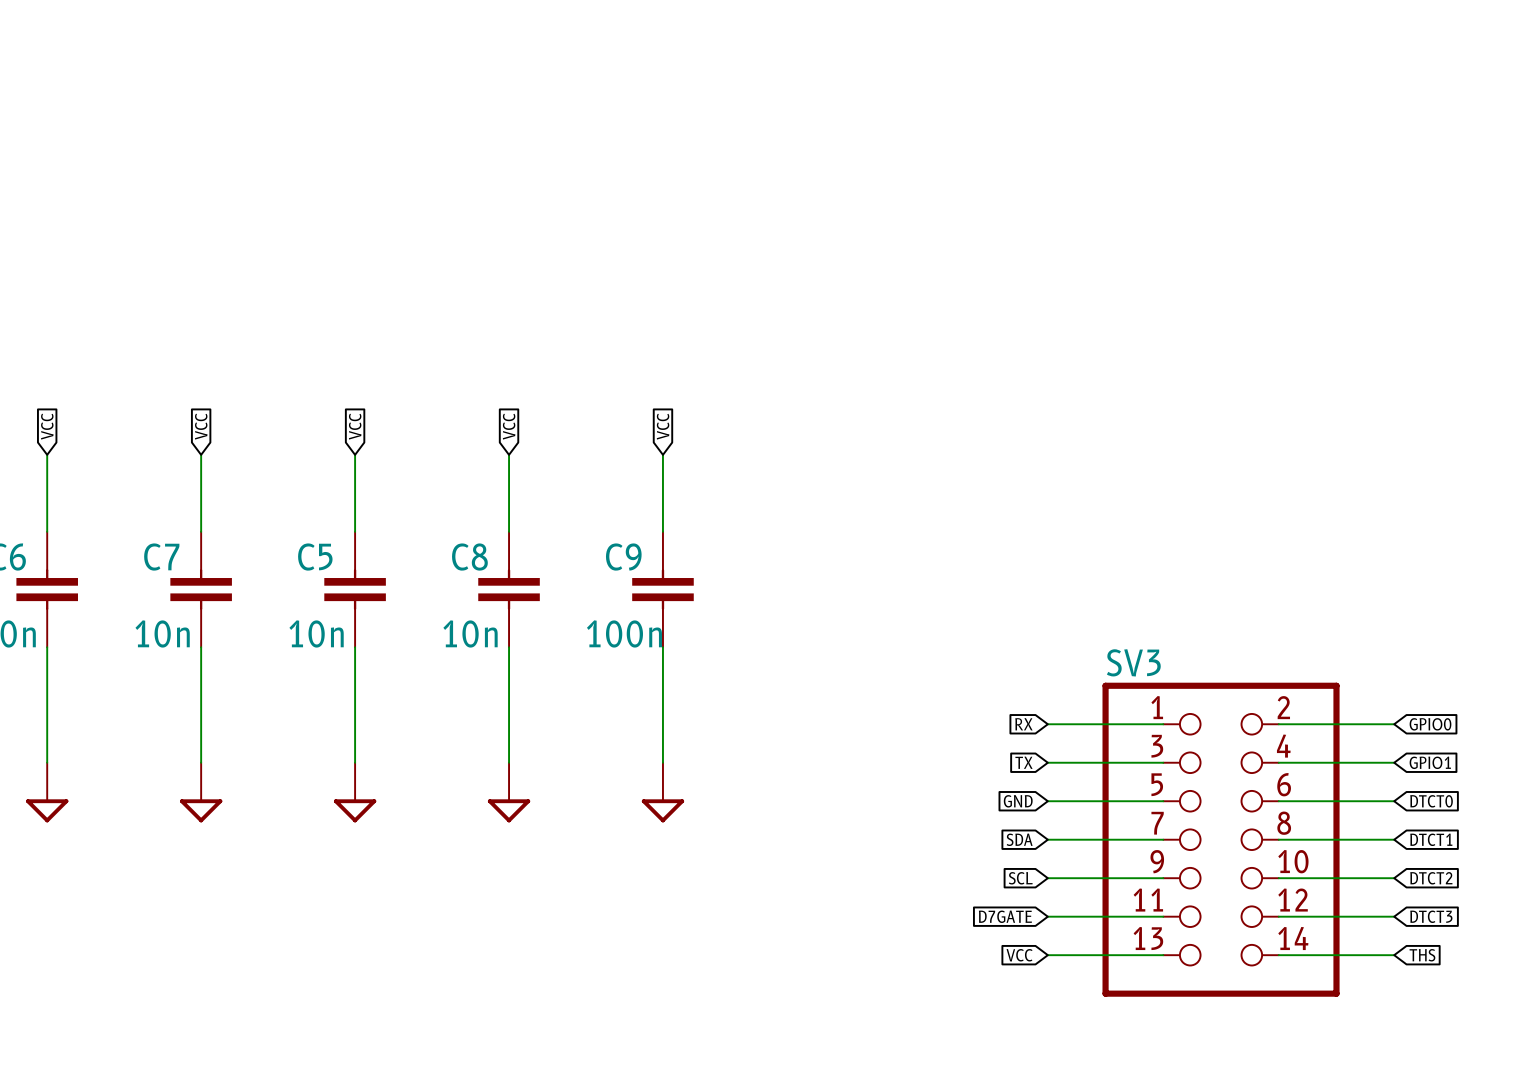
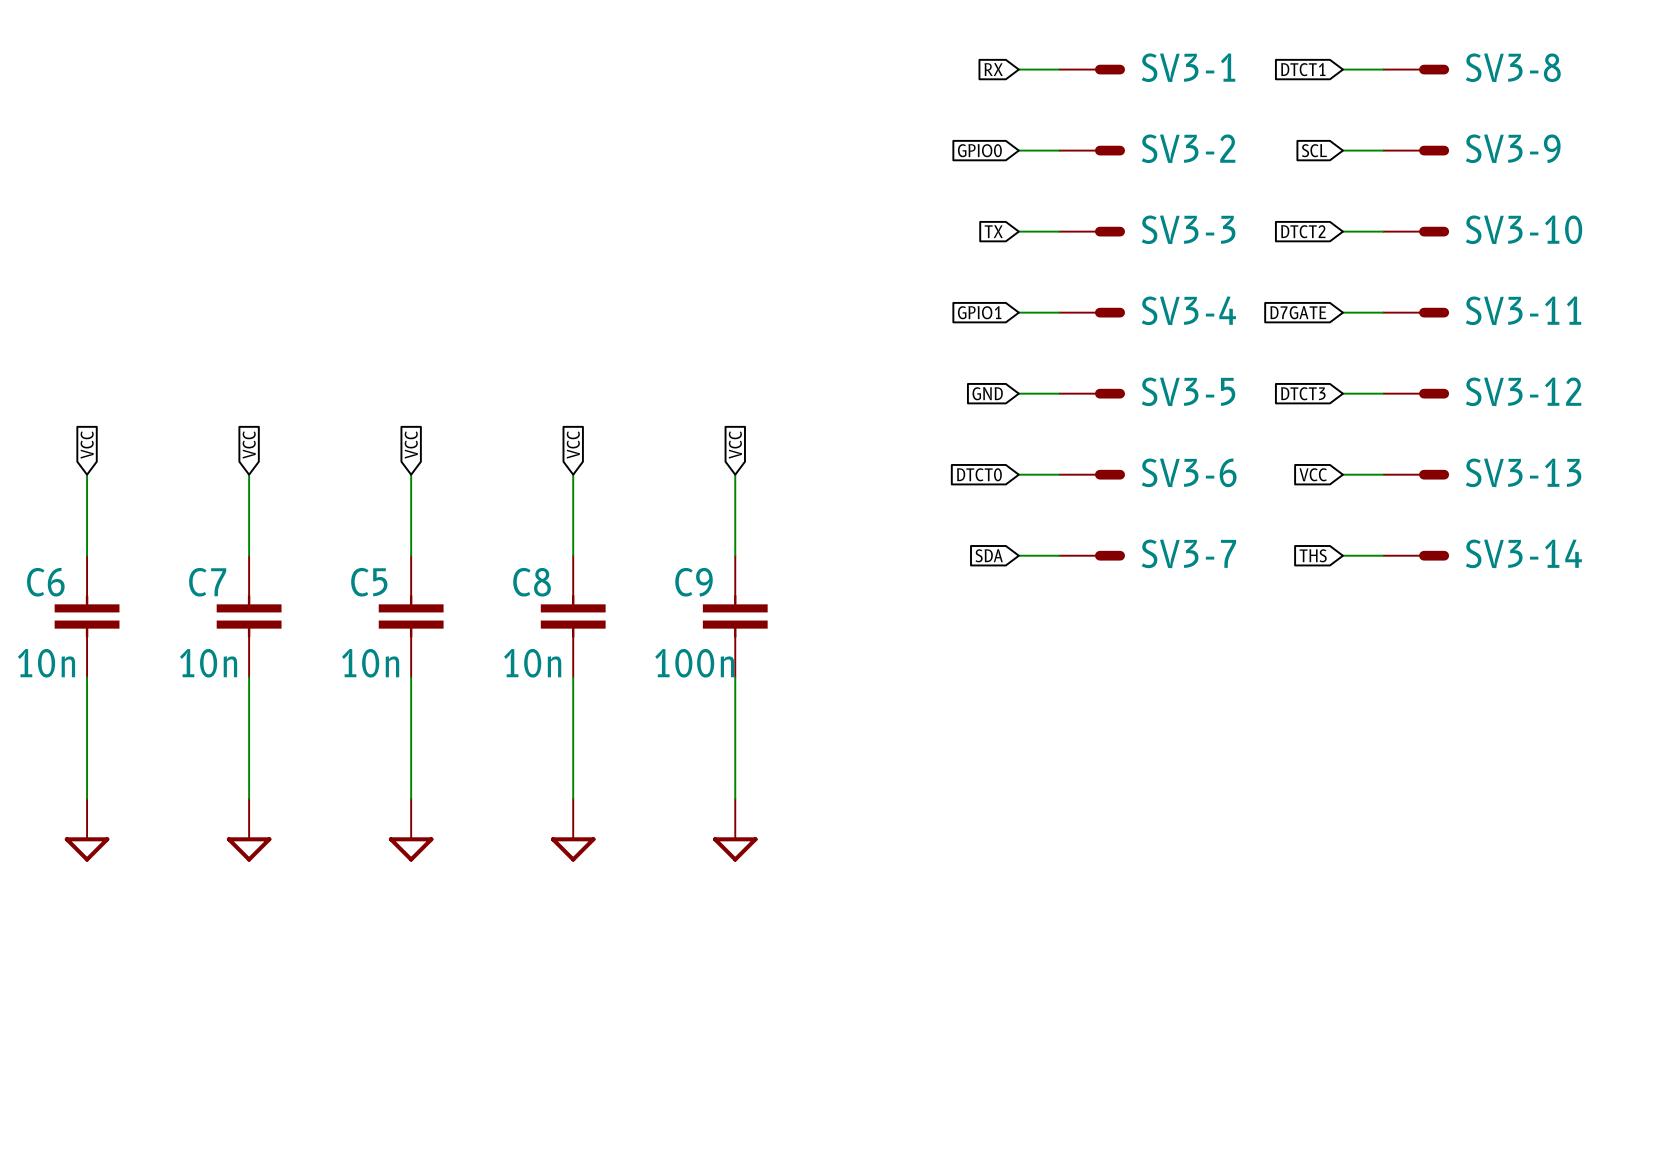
global label: none -> RX (993, 69)
wire: none -> (1018, 69) (1059, 69)
SV3-1: none -> (1092, 69)
wire: none -> (1342, 69) (1383, 69)
SV3-8: none -> (1416, 69)
global label: none -> DTCT1 (1303, 69)
wire: none -> (1018, 150) (1059, 150)
SV3-2: none -> (1092, 150)
wire: none -> (1342, 150) (1383, 150)
SV3-9: none -> (1416, 150)
global label: none -> GPIO0 (979, 150)
global label: none -> SCL (1314, 150)
global label: none -> TX (993, 231)
wire: none -> (1018, 231) (1059, 231)
SV3-3: none -> (1092, 231)
wire: none -> (1342, 231) (1383, 231)
SV3-10: none -> (1416, 231)
global label: none -> DTCT2 (1303, 231)
global label: none -> GPIO1 (979, 312)
wire: none -> (1018, 312) (1059, 312)
SV3-4: none -> (1092, 312)
global label: none -> D7GATE (1298, 312)
wire: none -> (1342, 312) (1383, 312)
SV3-11: none -> (1416, 312)
global label: none -> GND (987, 393)
wire: none -> (1018, 393) (1059, 393)
SV3-5: none -> (1092, 393)
global label: none -> DTCT3 (1303, 393)
wire: none -> (1342, 393) (1383, 393)
SV3-12: none -> (1416, 393)
global label: none -> DTCT0 (979, 474)
wire: none -> (1018, 474) (1059, 474)
SV3-6: none -> (1092, 474)
global label: none -> VCC (1313, 474)
wire: none -> (1342, 474) (1383, 474)
SV3-13: none -> (1416, 474)
wire: none -> (1018, 555) (1059, 555)
SV3-7: none -> (1092, 555)
global label: none -> THS (1313, 555)
wire: none -> (1342, 555) (1383, 555)
SV3-14: none -> (1416, 555)
global label: RX (1023, 724) -> none
wire: (1047, 724) (1163, 724) -> none
wire: (1278, 724) (1394, 724) -> none
global label: GPIO0 (1430, 724) -> none
global label: TX (1024, 762) -> none
wire: (1047, 762) (1163, 762) -> none
wire: (1278, 762) (1394, 762) -> none
global label: GPIO1 (1430, 762) -> none
global label: GND (1018, 801) -> none
wire: (1047, 801) (1163, 801) -> none
wire: (1278, 801) (1394, 801) -> none
global label: DTCT0 (1431, 801) -> none
global label position: SDA (1019, 839) -> SDA (989, 555)
wire: (1047, 839) (1163, 839) -> none
SV3: (1221, 839) -> none
wire: (1278, 839) (1394, 839) -> none
global label: DTCT1 (1431, 839) -> none
global label: SCL (1020, 878) -> none
wire: (1047, 878) (1163, 878) -> none
wire: (1278, 878) (1394, 878) -> none
global label: DTCT2 (1431, 878) -> none
global label: D7GATE (1005, 916) -> none
wire: (1047, 916) (1163, 916) -> none
wire: (1278, 916) (1394, 916) -> none
global label: DTCT3 (1431, 916) -> none
global label: VCC (1019, 955) -> none
wire: (1047, 955) (1163, 955) -> none
wire: (1278, 955) (1394, 955) -> none
global label: THS (1422, 955) -> none

